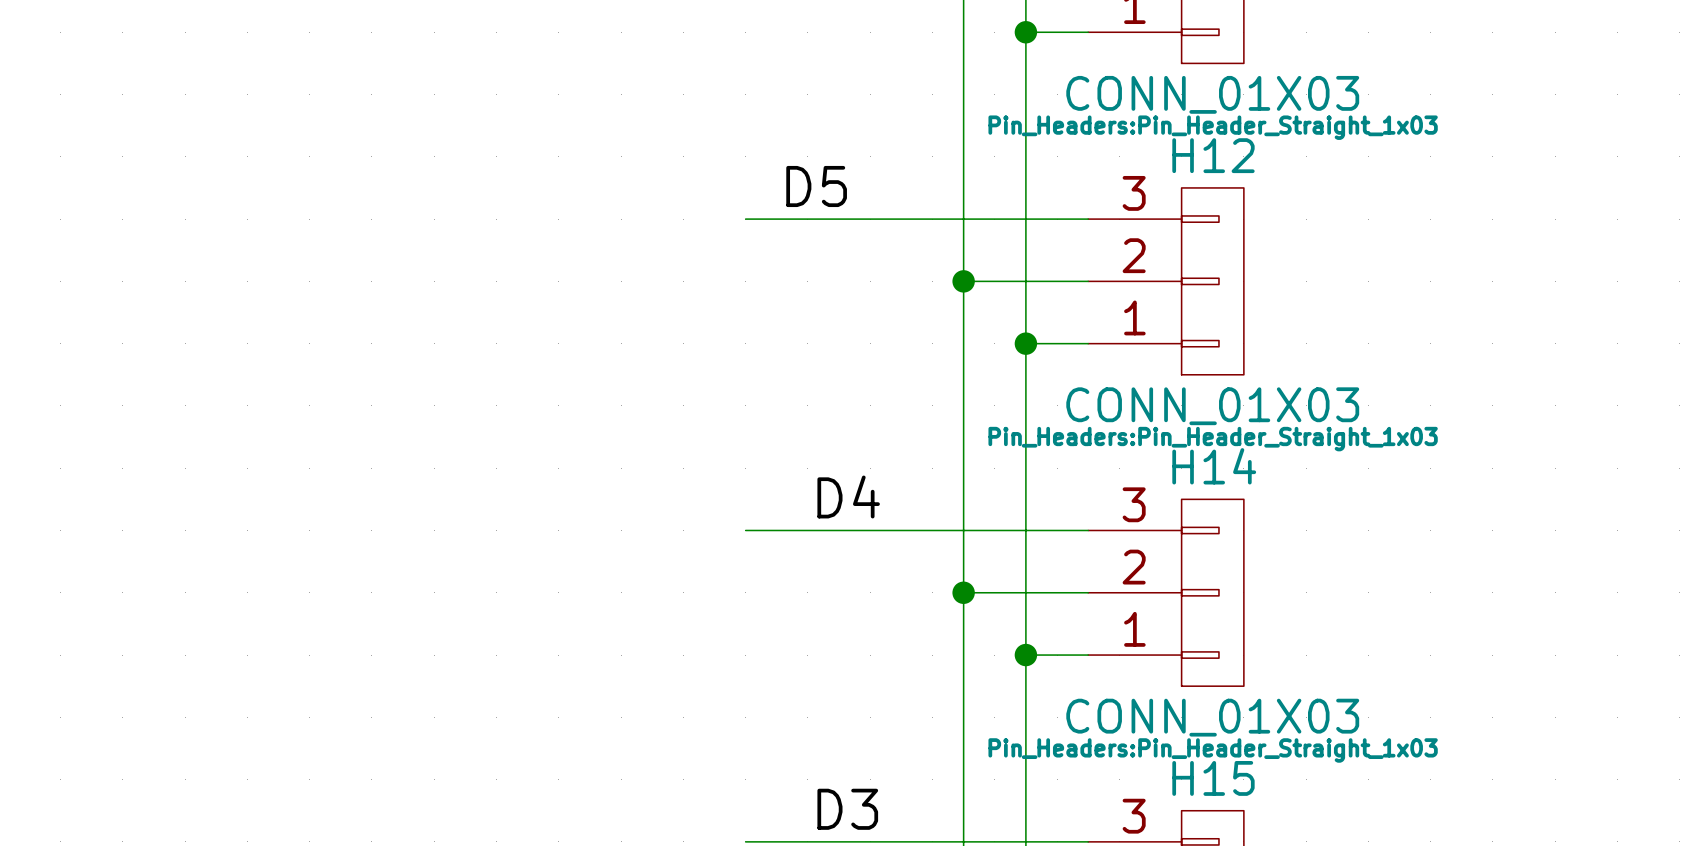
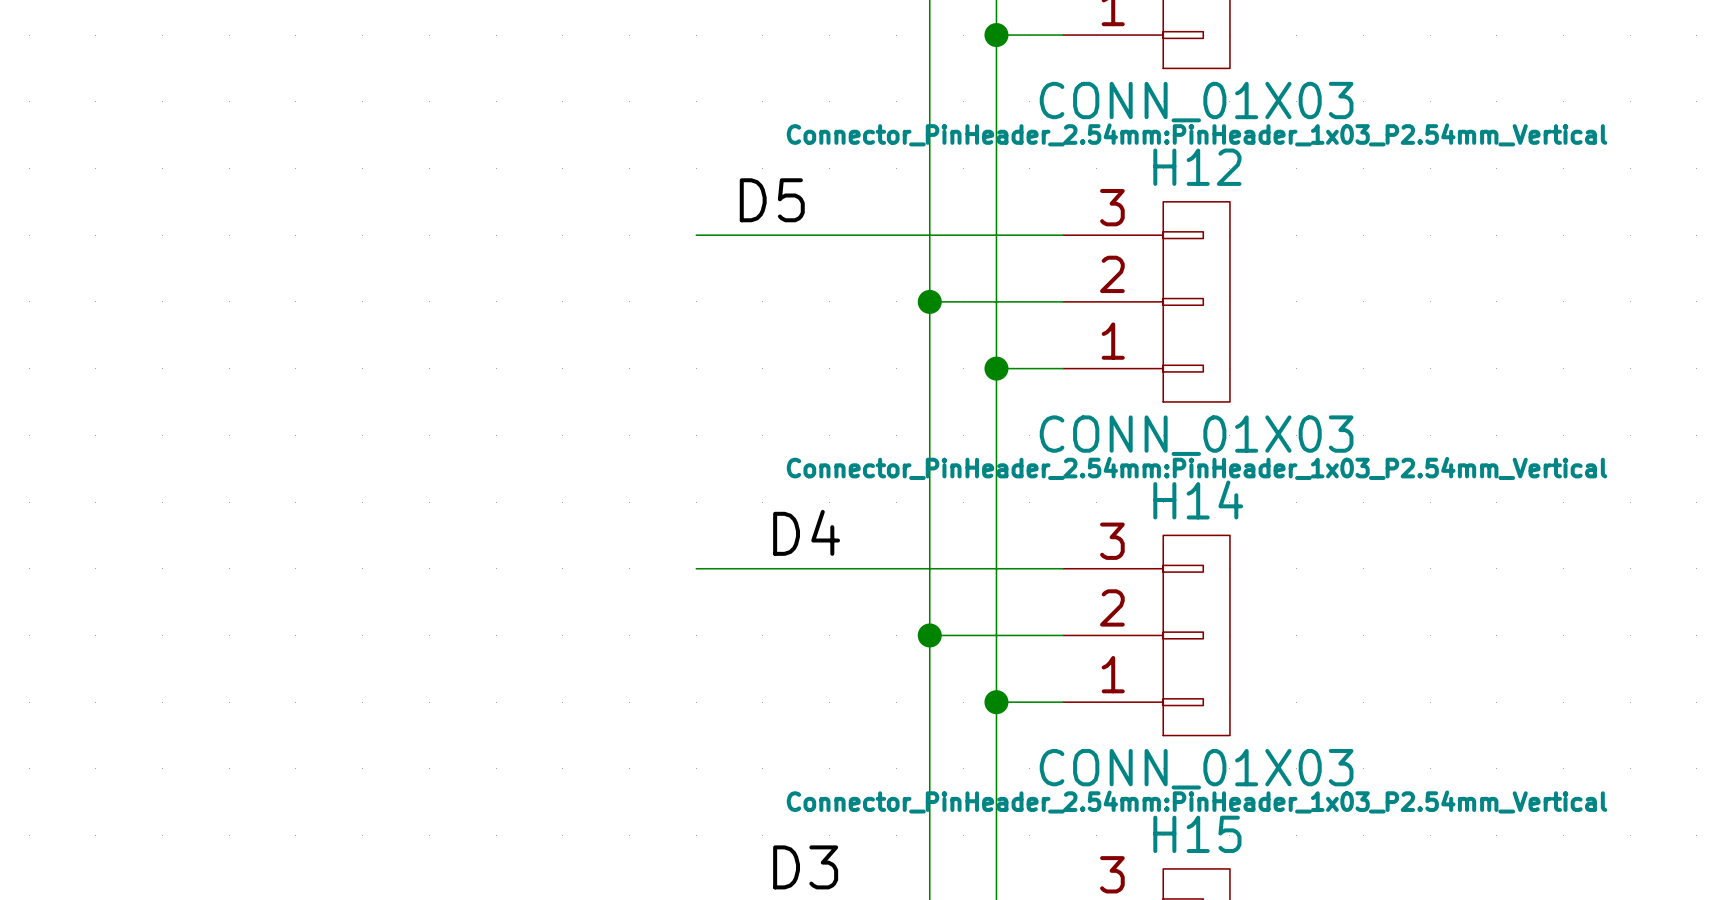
part text: Pin_Headers:Pin_Header_Straight_1x03 (1213, 127) -> Connector_PinHeader_2.54mm:PinHeader_1x03_P2.54mm_Vertical (1197, 134)
H12 text: Pin_Headers:Pin_Header_Straight_1x03 (1213, 439) -> Connector_PinHeader_2.54mm:PinHeader_1x03_P2.54mm_Vertical (1197, 468)
H14 text: Pin_Headers:Pin_Header_Straight_1x03 (1213, 750) -> Connector_PinHeader_2.54mm:PinHeader_1x03_P2.54mm_Vertical (1197, 802)

